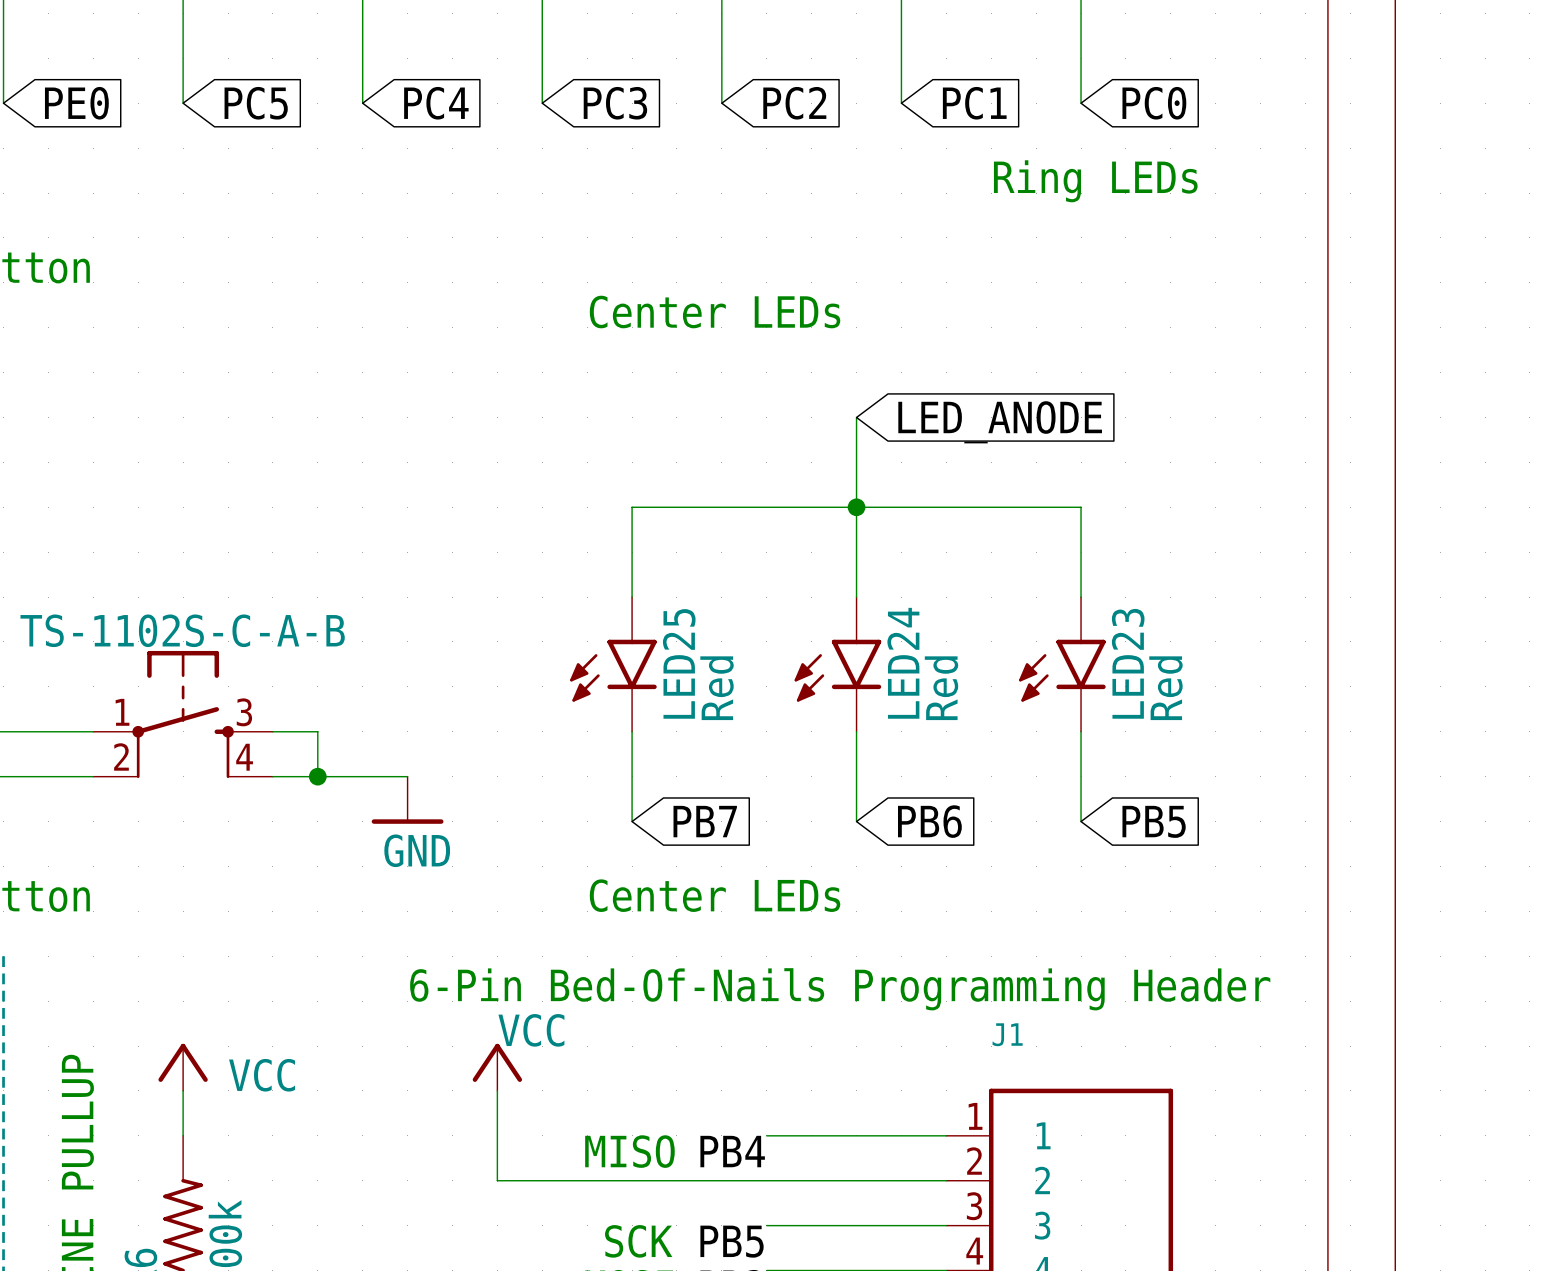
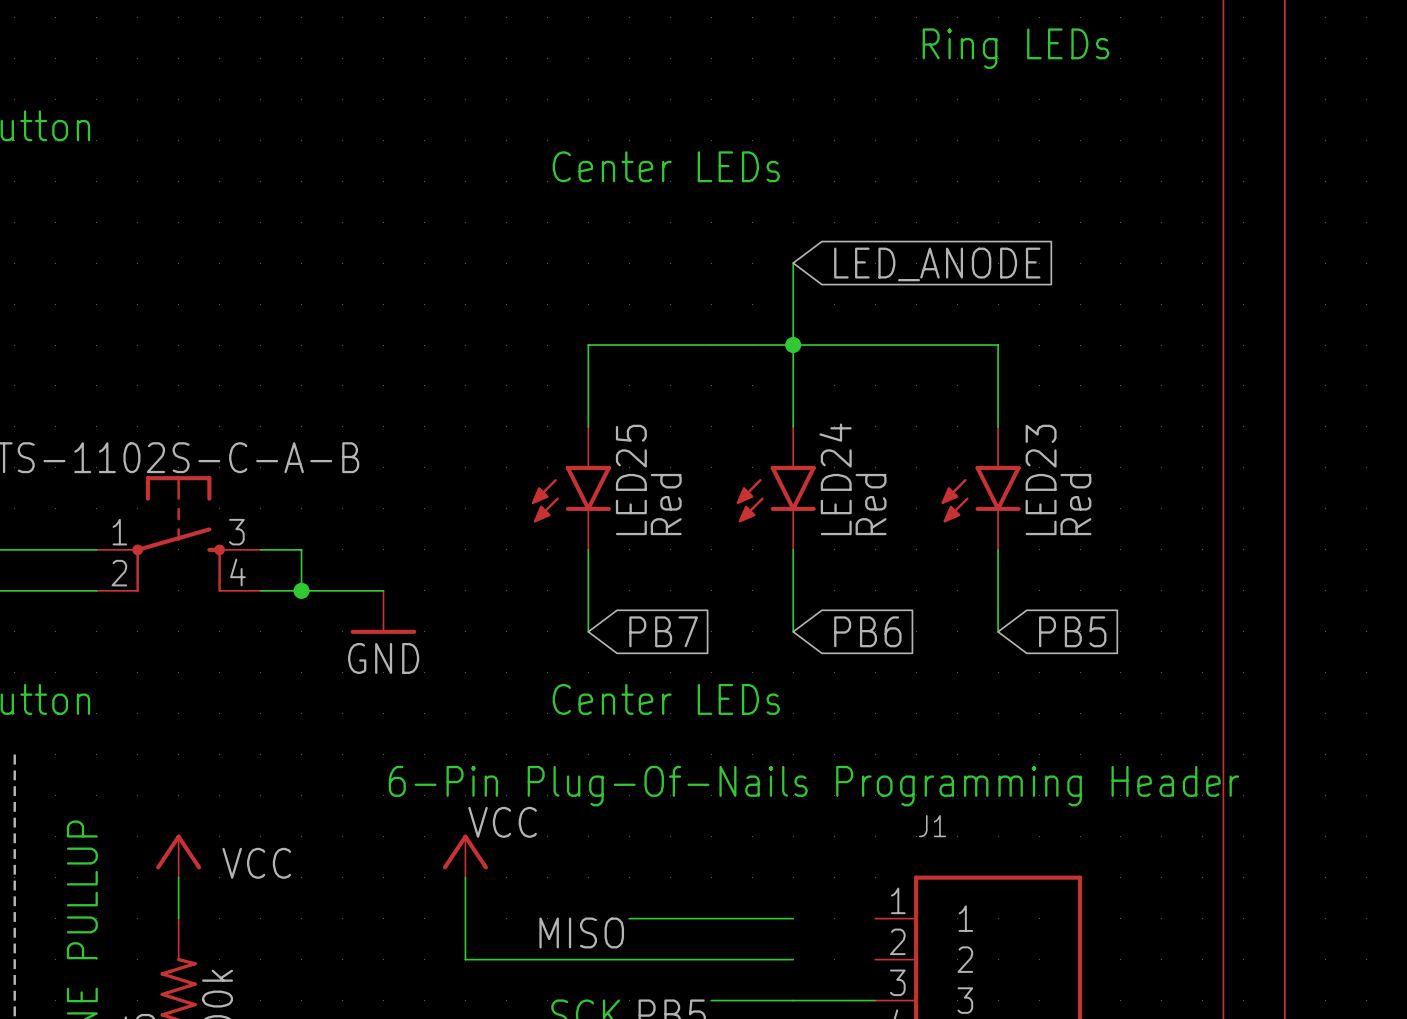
text: 6-Pin Bed-Of-Nails Programming Header (840, 989) -> 6-Pin Plug-Of-Nails Programming Header (813, 786)
wire: (856, 1135) (946, 1135) -> (629, 918) (711, 918)
text: MISO (629, 1151) -> none
label: none -> MISO (581, 932)
label: PB4 (732, 1151) -> none
wire: (856, 1180) (946, 1180) -> none

